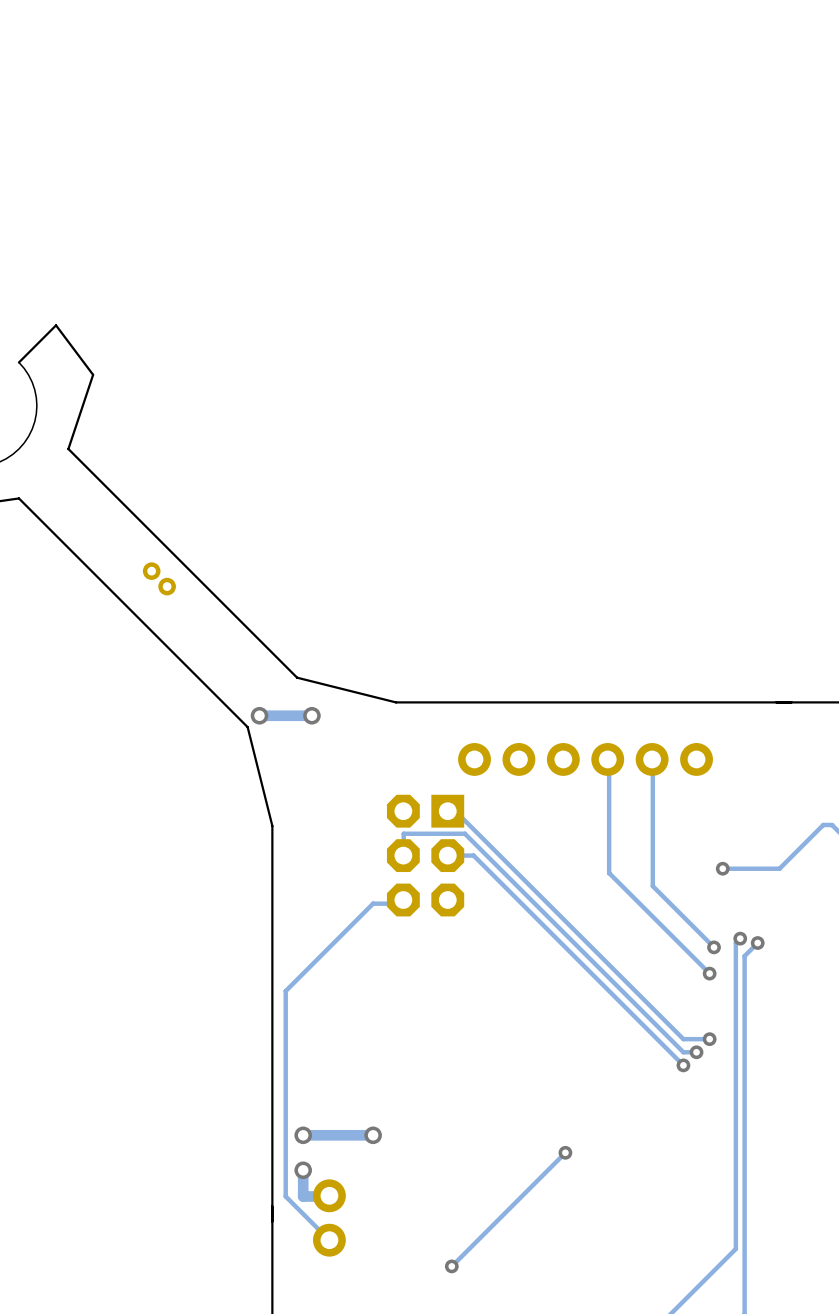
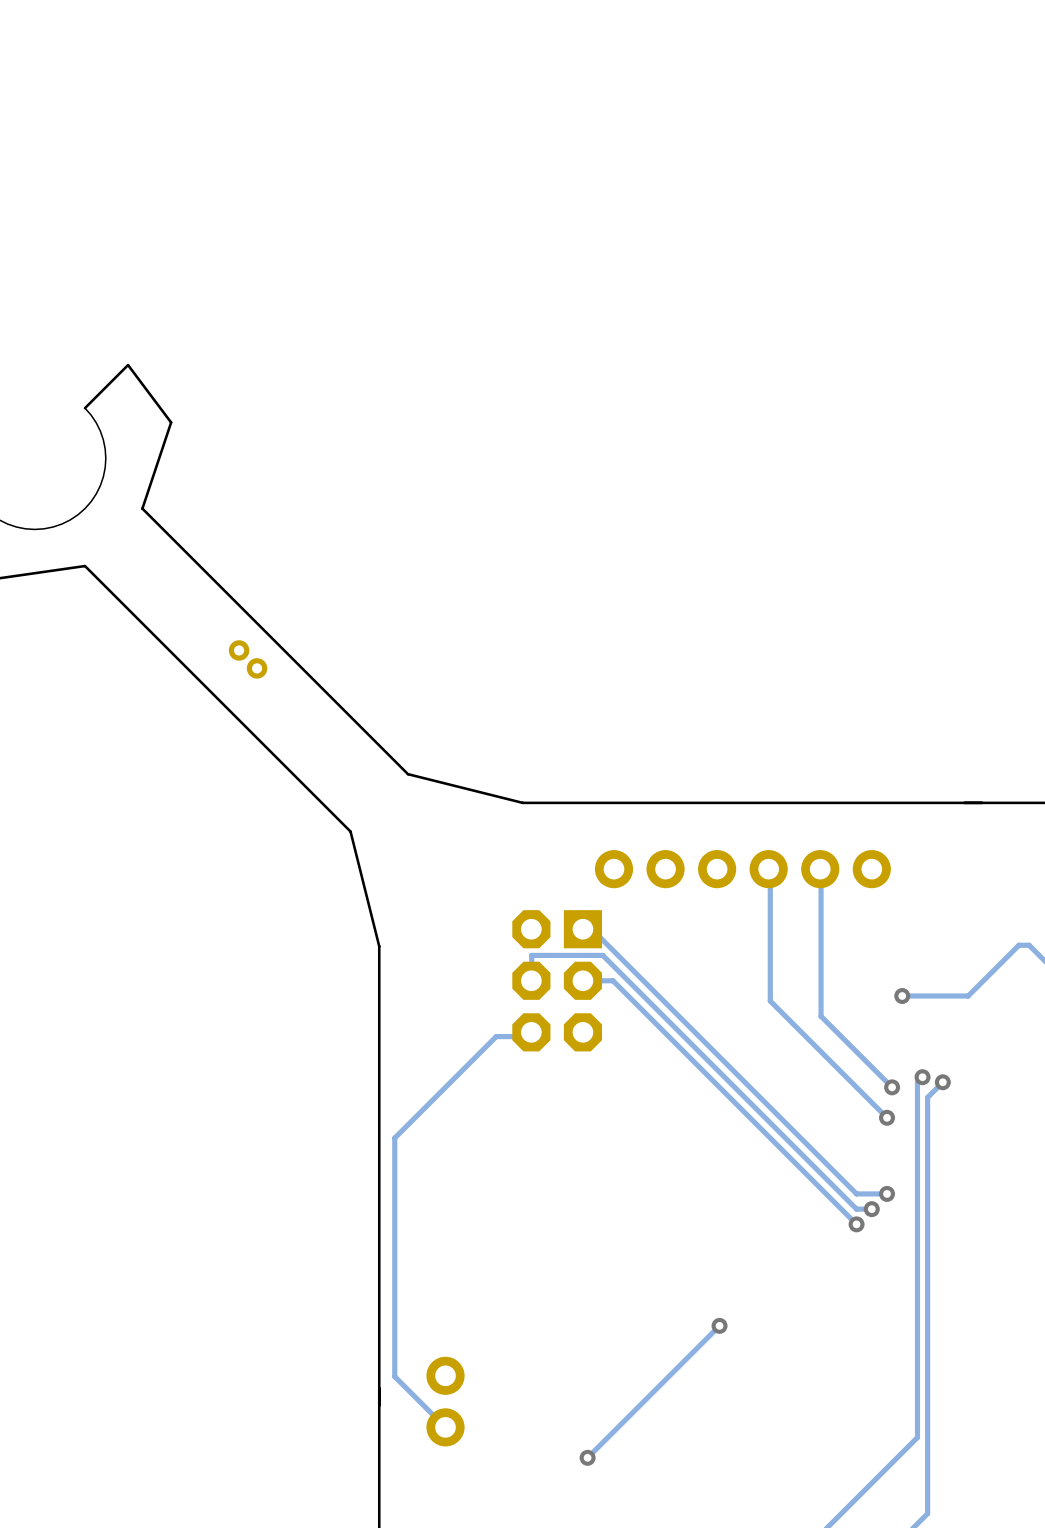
via: (259, 715) -> none
track: (311, 715) (259, 715) -> none
via: (311, 715) -> none
via: (303, 1135) -> none
track: (373, 1135) (303, 1135) -> none
via: (373, 1135) -> none
track: (303, 1170) (303, 1196) (329, 1195) -> none
via: (303, 1170) -> none

